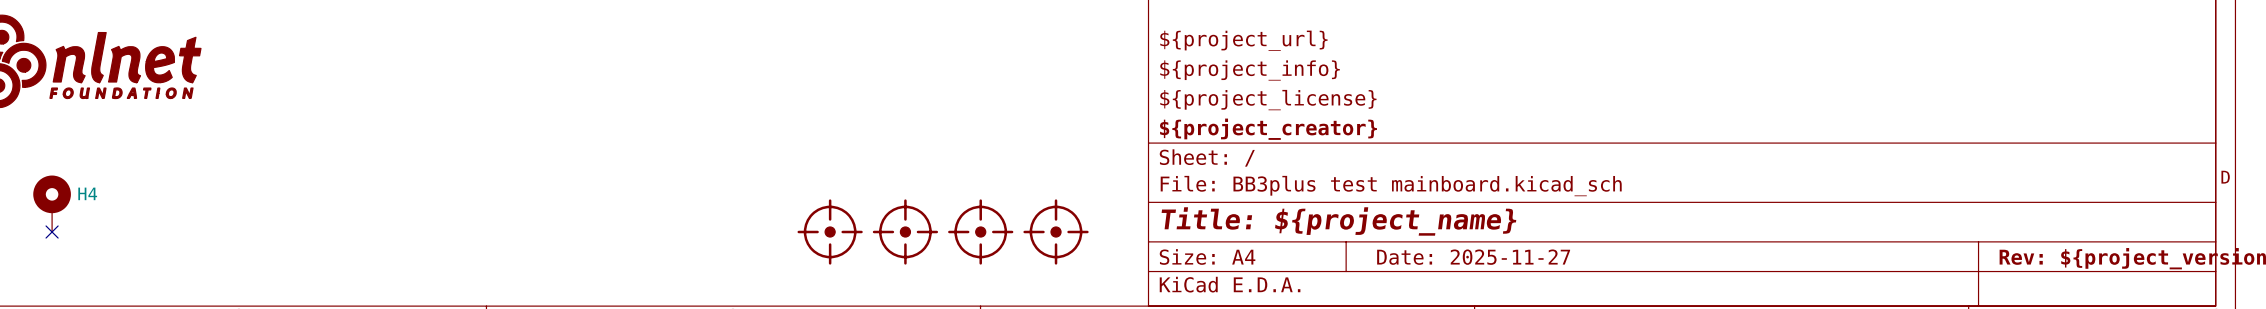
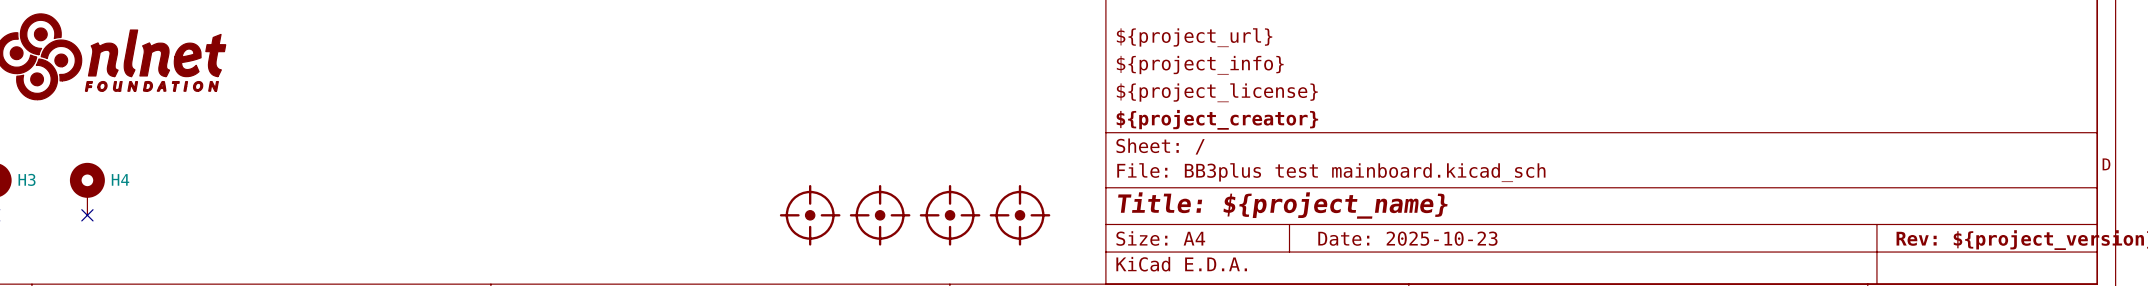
title block: Date: 2025-11-27 (1473, 257) -> Date: 2025-10-23 (1407, 238)

